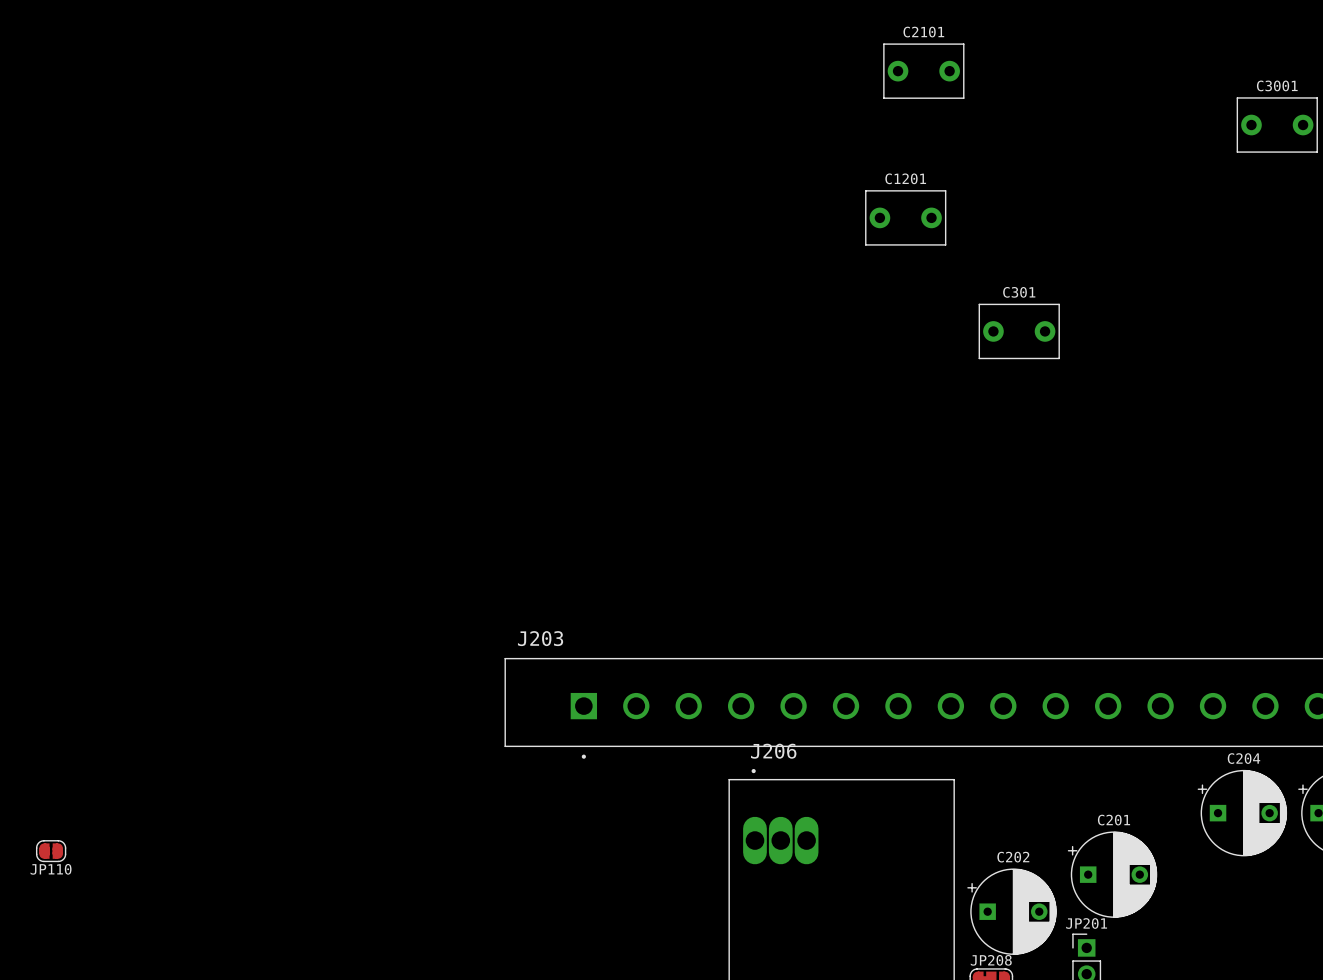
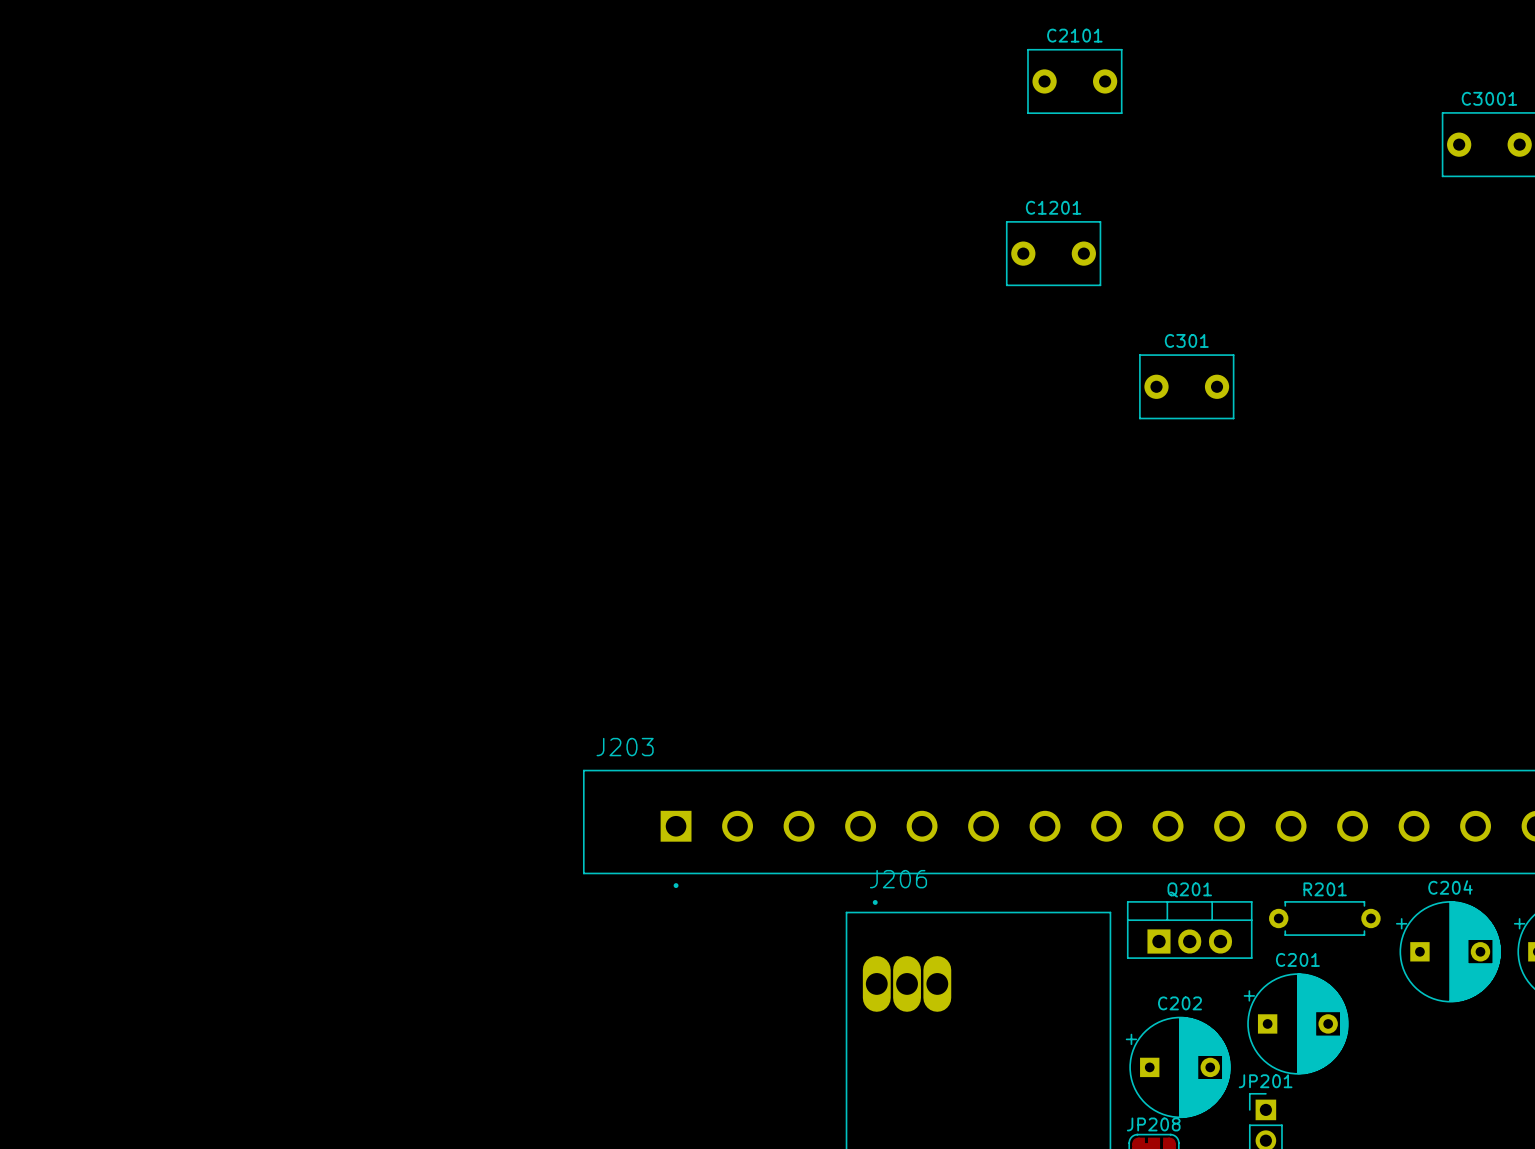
R201: none -> (1324, 918)
Q201: none -> (1189, 930)
JP110: (51, 851) -> none

